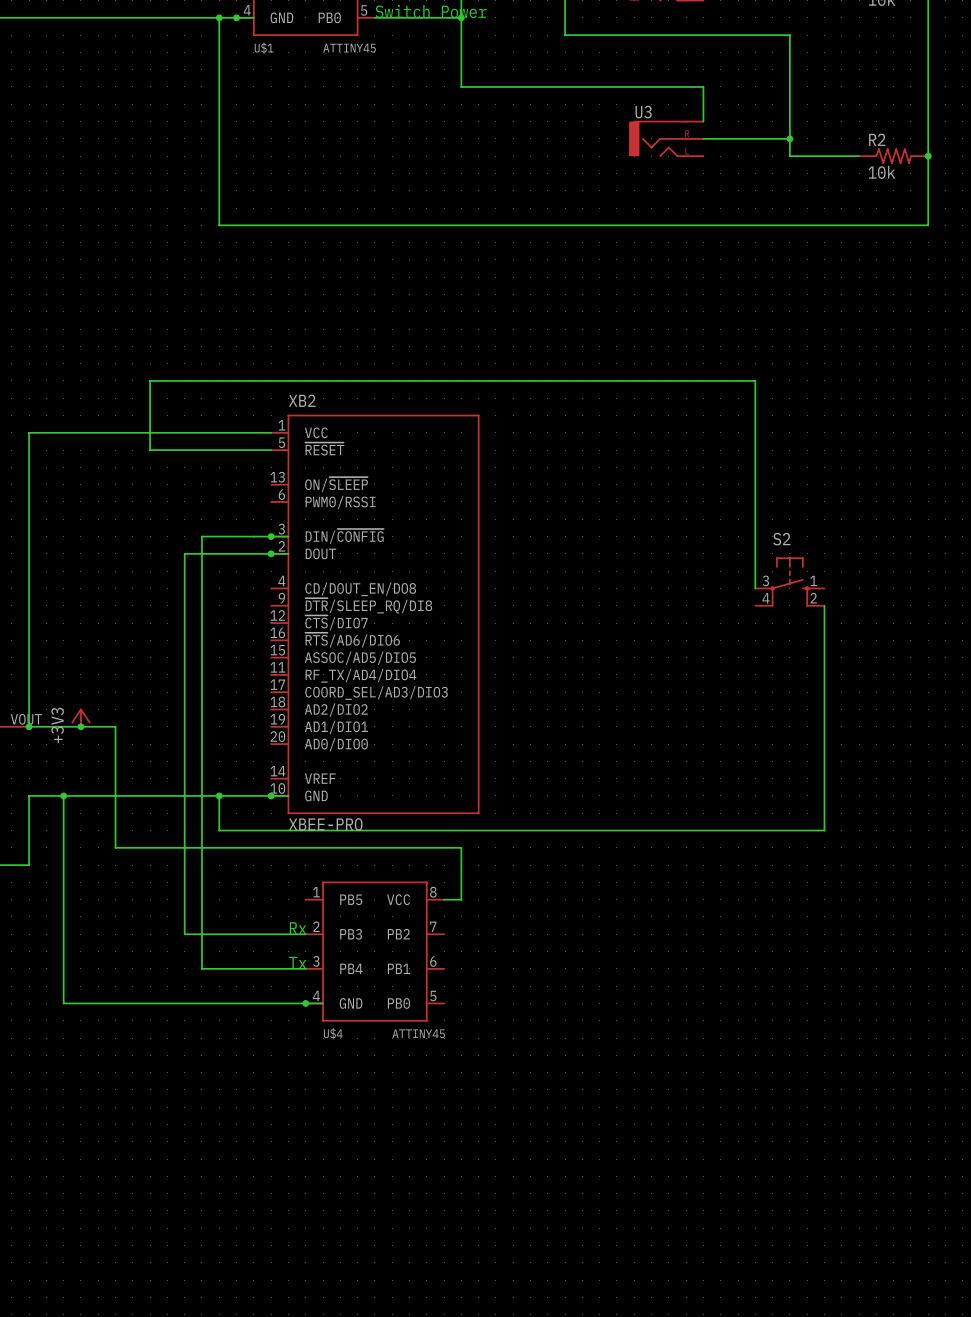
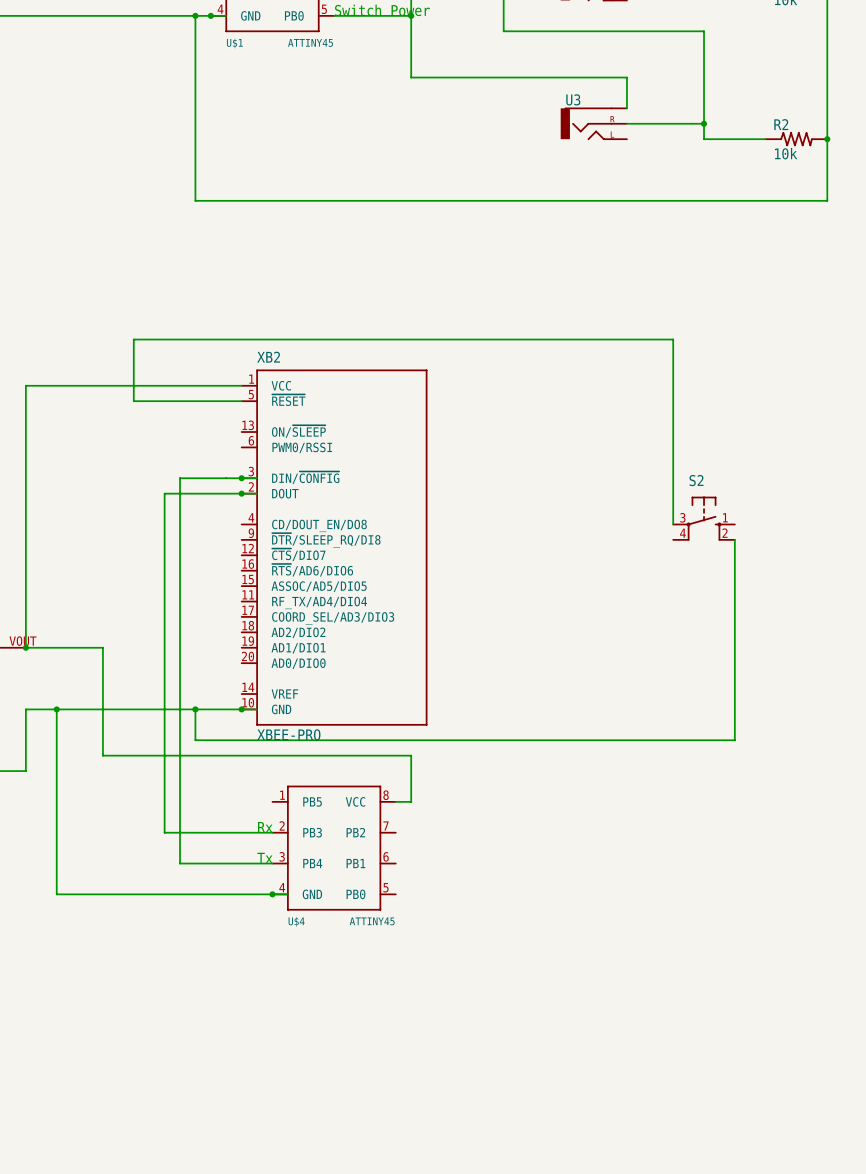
power symbol: +3V3 (80, 717) -> none
junction: (80, 726) -> none

